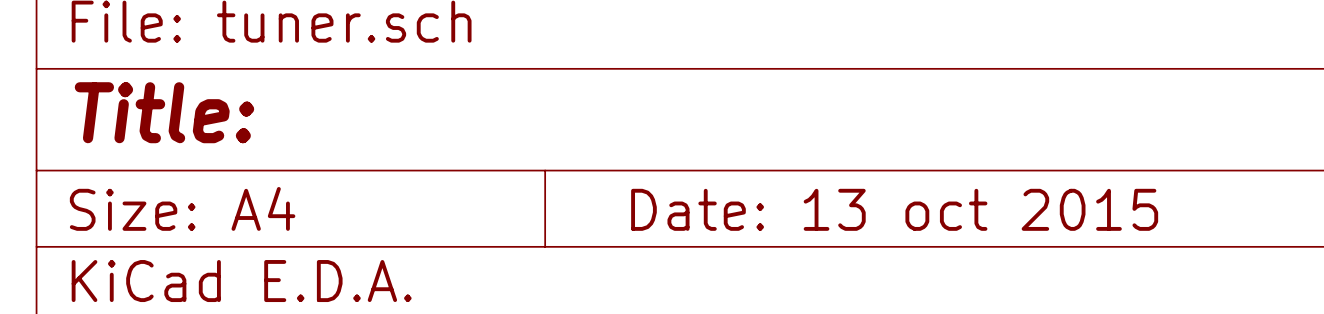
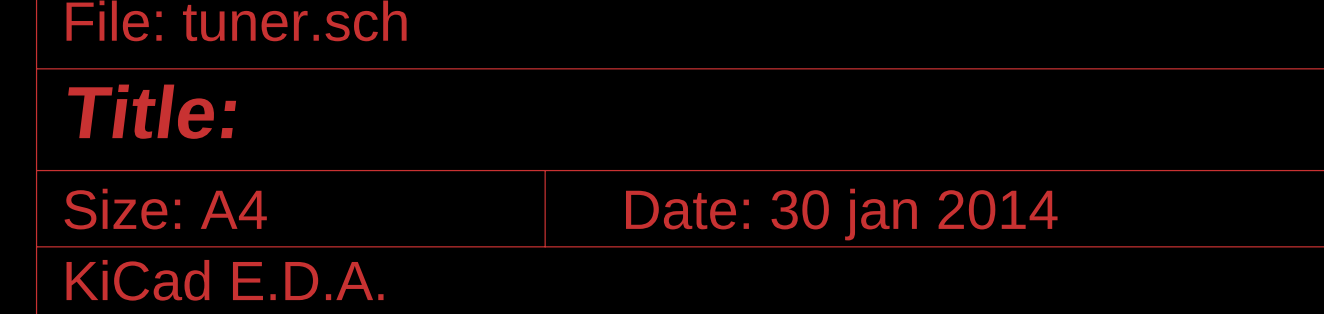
title block: Date: 13 oct 2015 (894, 209) -> Date: 30 jan 2014 (841, 214)

